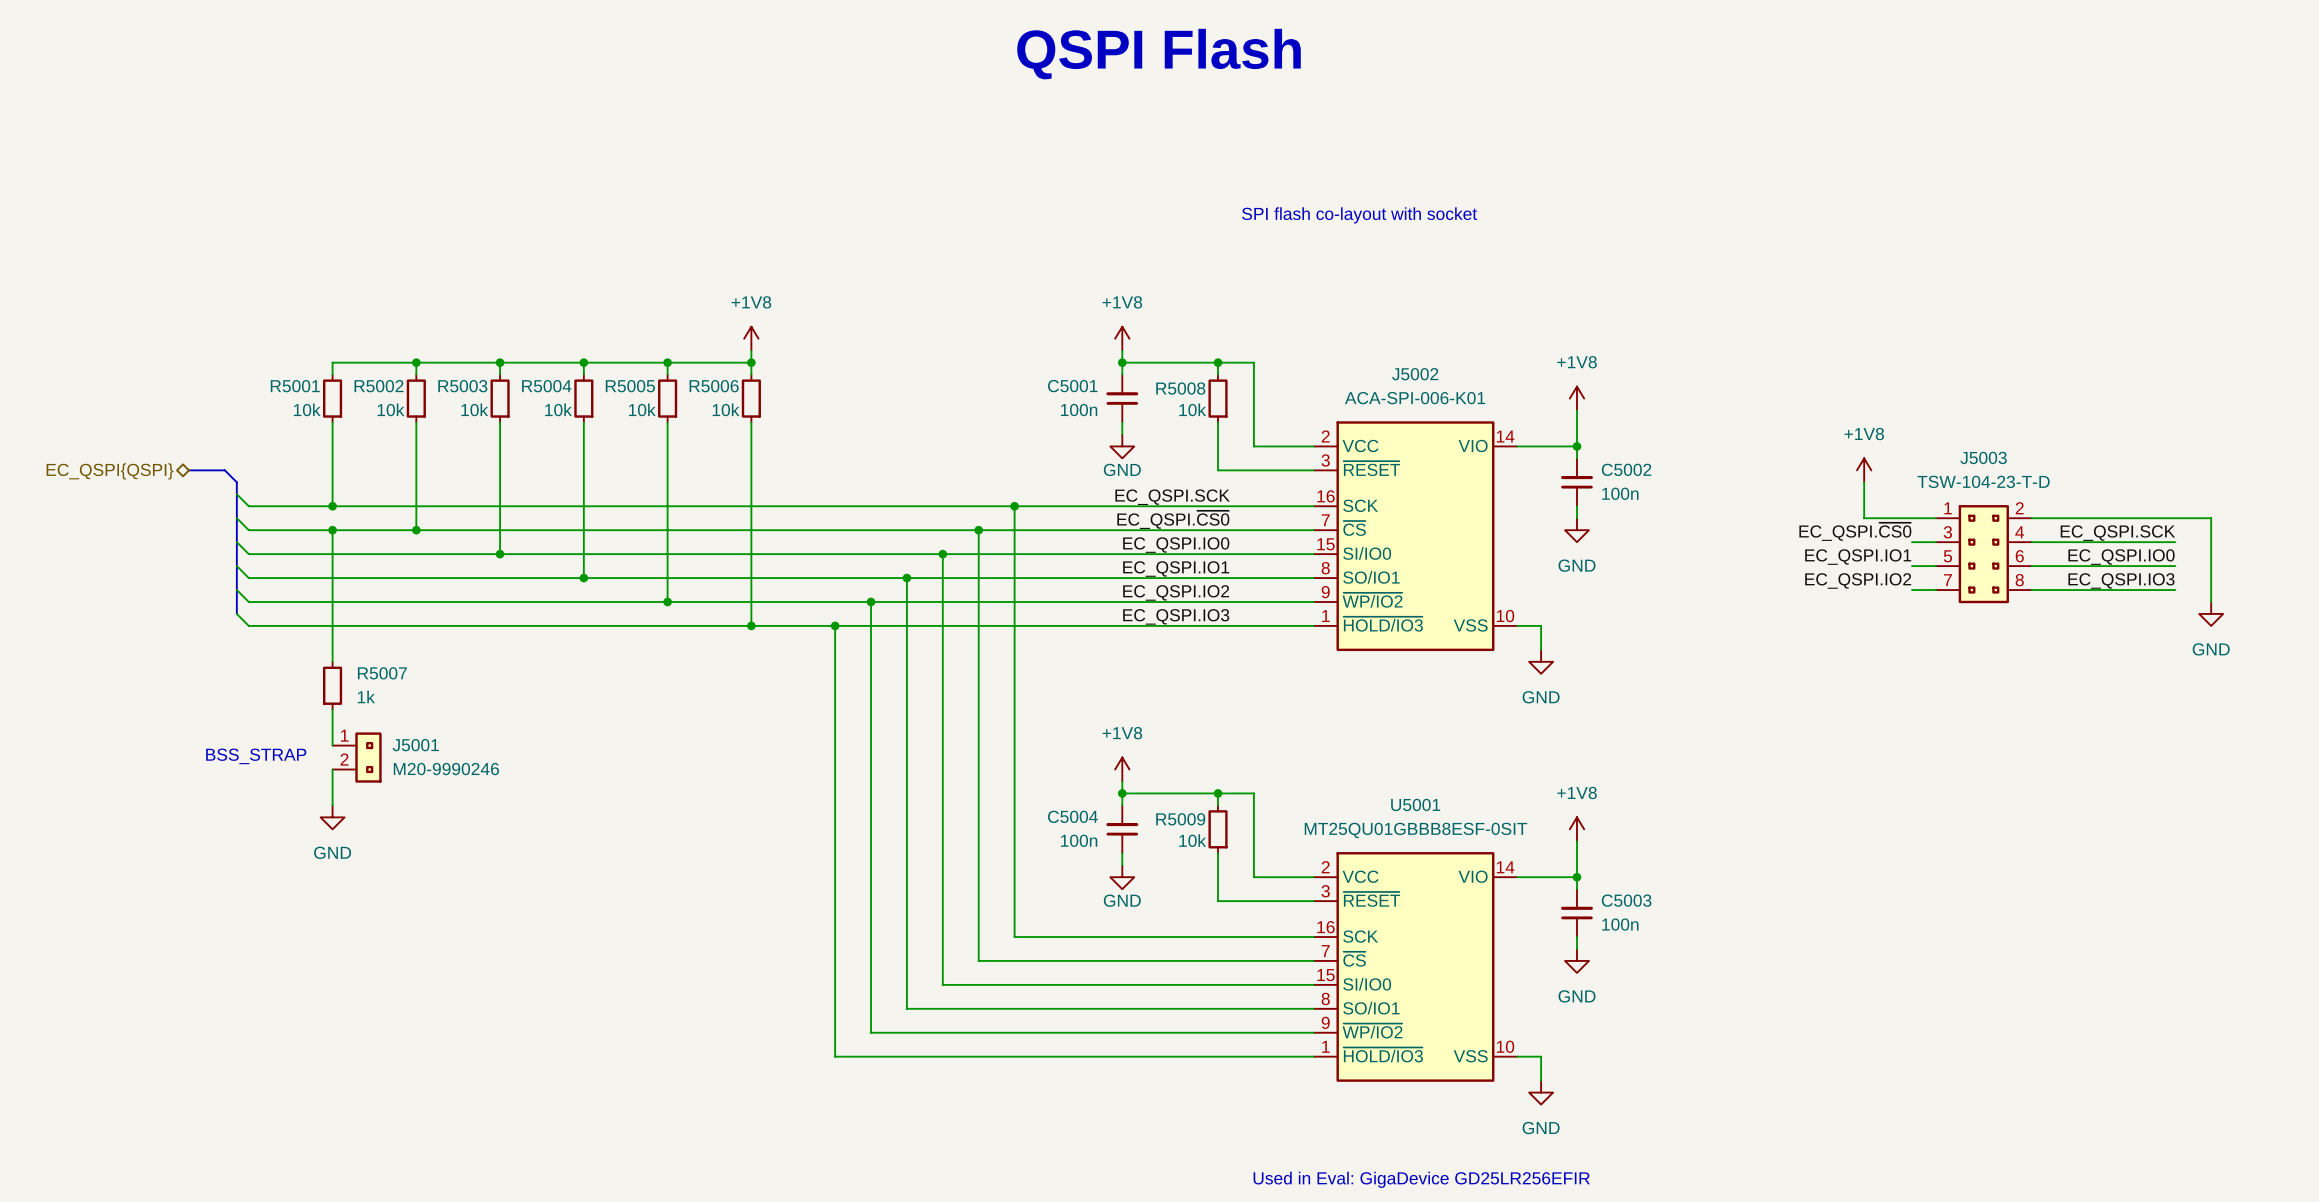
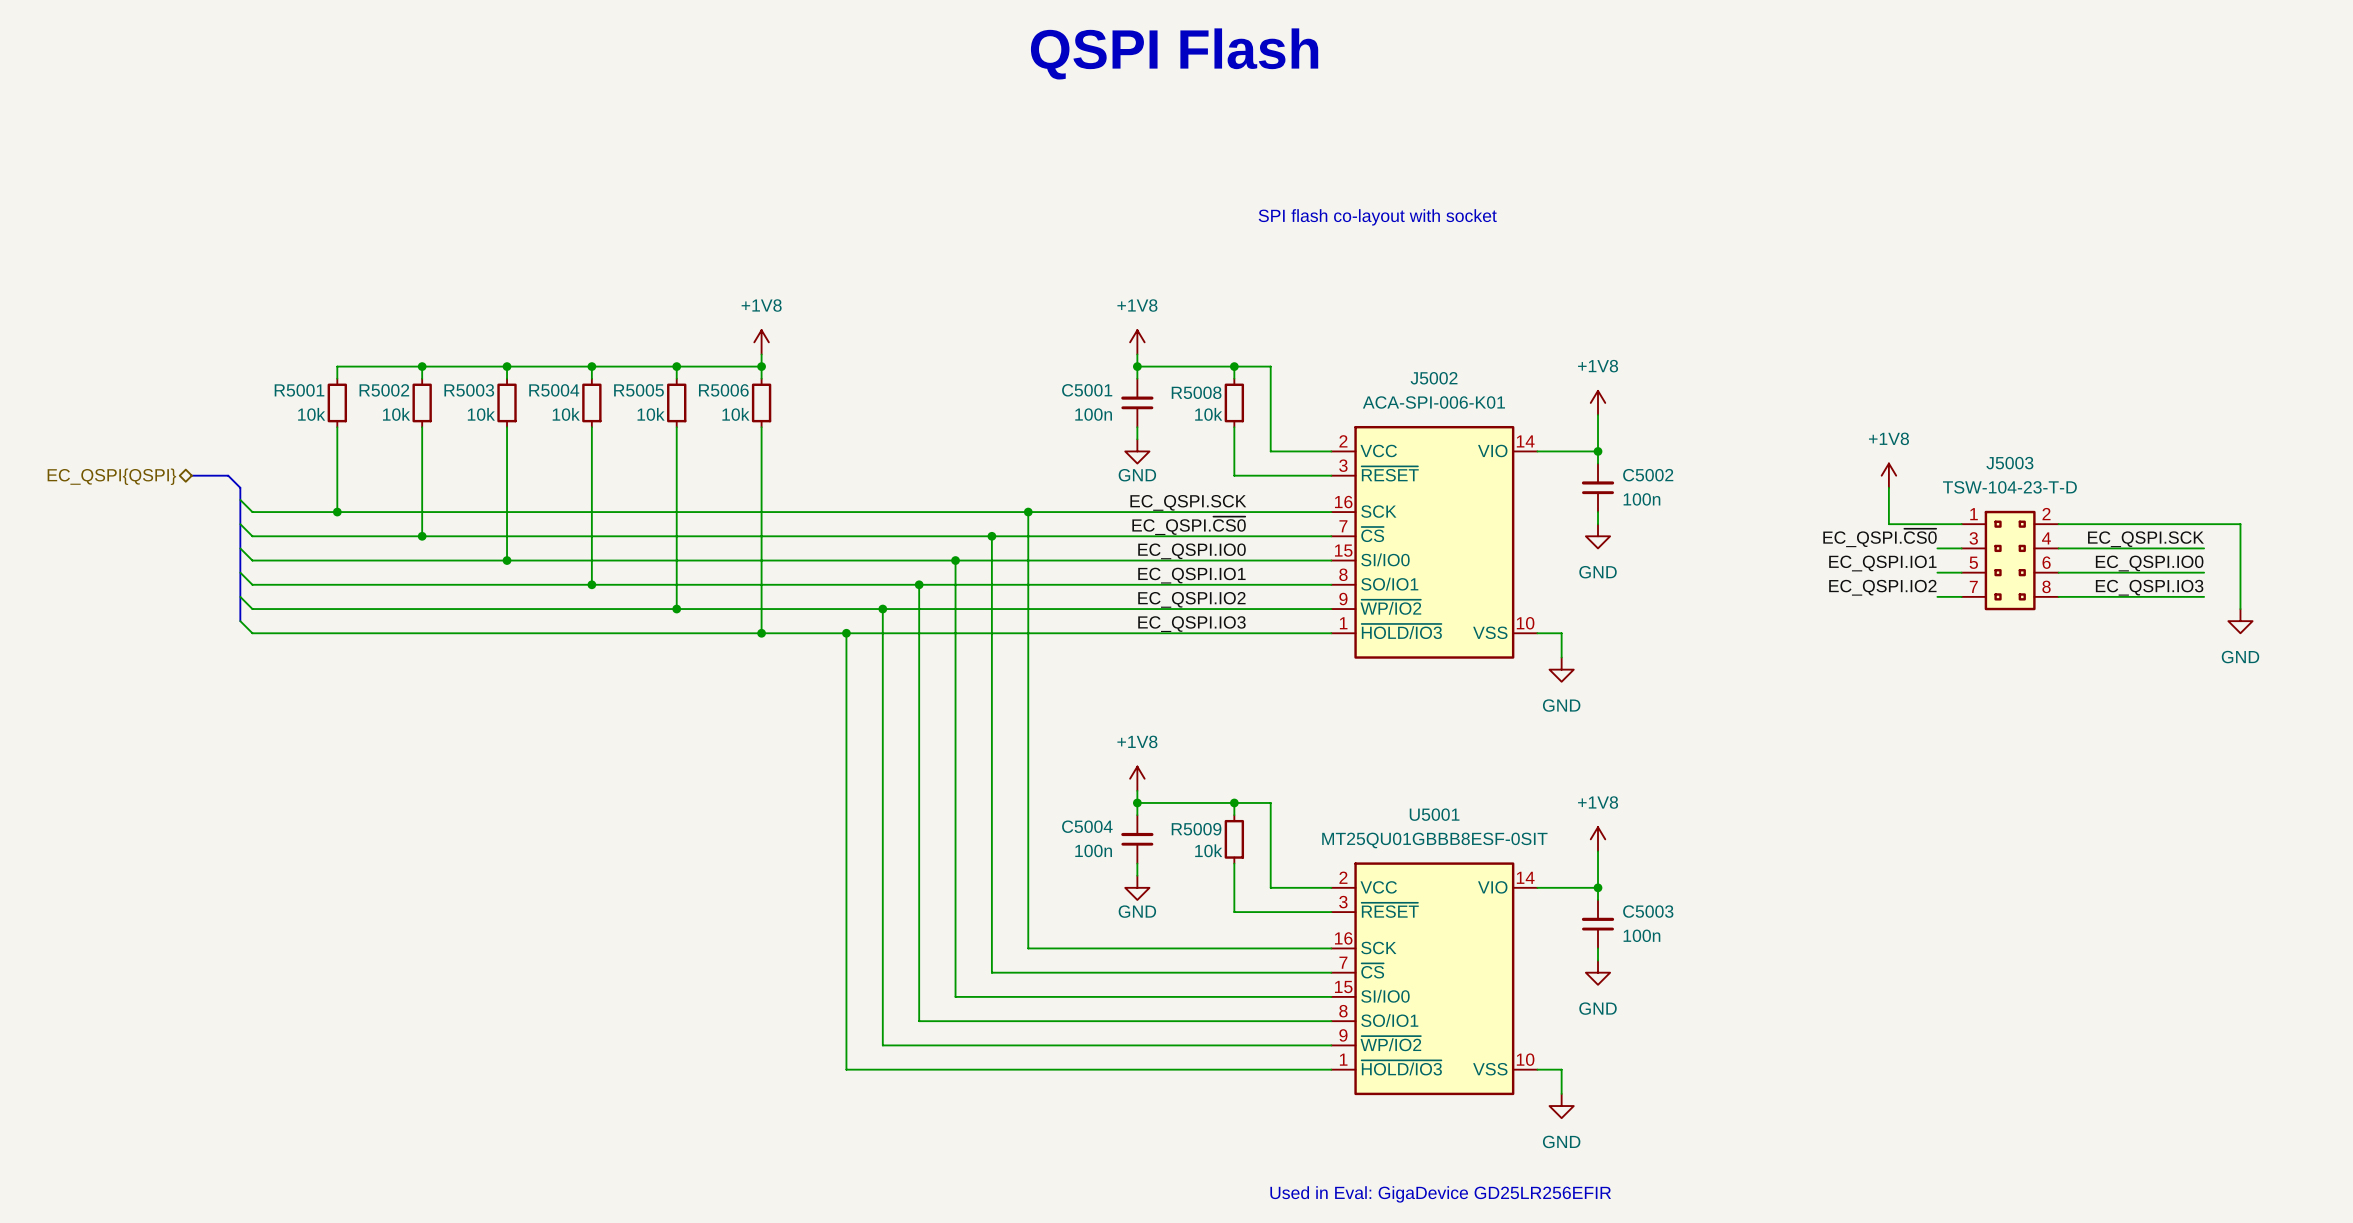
wire: (332, 530) (332, 661) -> none
junction: (332, 530) -> none
R5007: (332, 685) -> none
wire: (332, 709) (332, 745) -> none
text: BSS_STRAP (256, 756) -> none
J5001: (357, 757) -> none
wire: (332, 769) (332, 805) -> none
power symbol: GND (332, 817) -> none

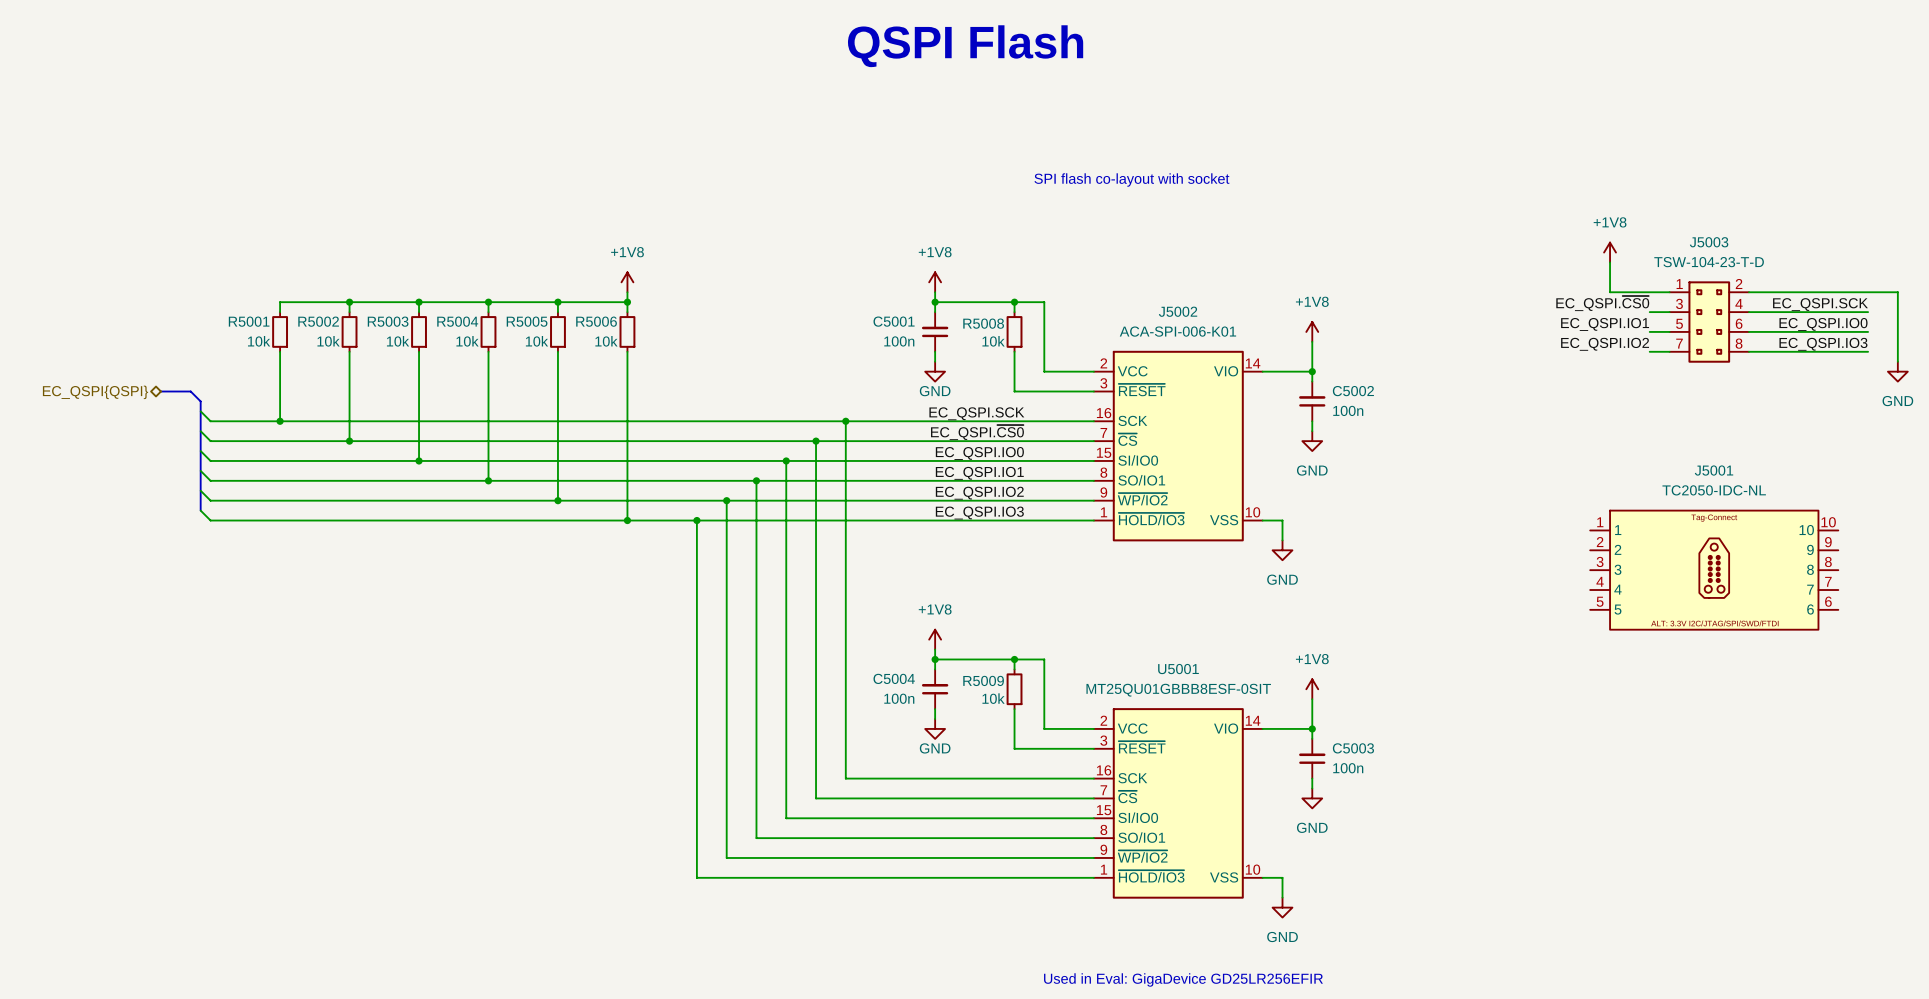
power symbol position: +1V8 (1888, 475) -> +1V8 (1610, 252)
wire: (1888, 487) (1888, 524) (1961, 524) -> (1610, 262) (1610, 292) (1669, 292)
wire: (2058, 524) (2240, 524) (2240, 609) -> (1748, 292) (1897, 292) (1897, 361)
label position: EC_QSPI.~{CS0} (1880, 537) -> EC_QSPI.~{CS0} (1602, 303)
label position: EC_QSPI.SCK (2145, 539) -> EC_QSPI.SCK (1820, 304)
wire: (1937, 548) (1961, 548) -> (1649, 312) (1669, 312)
wire: (2058, 548) (2204, 548) -> (1748, 312) (1868, 312)
J5003 position: (2010, 560) -> (1709, 322)
label position: EC_QSPI.IO1 (1882, 563) -> EC_QSPI.IO1 (1605, 324)
label position: EC_QSPI.IO0 (2149, 563) -> EC_QSPI.IO0 (1823, 324)
wire: (1937, 572) (1961, 572) -> (1649, 331) (1669, 331)
wire: (2058, 572) (2204, 572) -> (1748, 331) (1868, 331)
label position: EC_QSPI.IO2 (1882, 587) -> EC_QSPI.IO2 (1605, 344)
label position: EC_QSPI.IO3 (2149, 587) -> EC_QSPI.IO3 (1823, 344)
wire: (1937, 596) (1961, 596) -> (1649, 351) (1669, 351)
wire: (2058, 596) (2204, 596) -> (1748, 351) (1868, 351)
power symbol position: GND (2240, 621) -> GND (1897, 371)
J5001: none -> (1714, 570)

